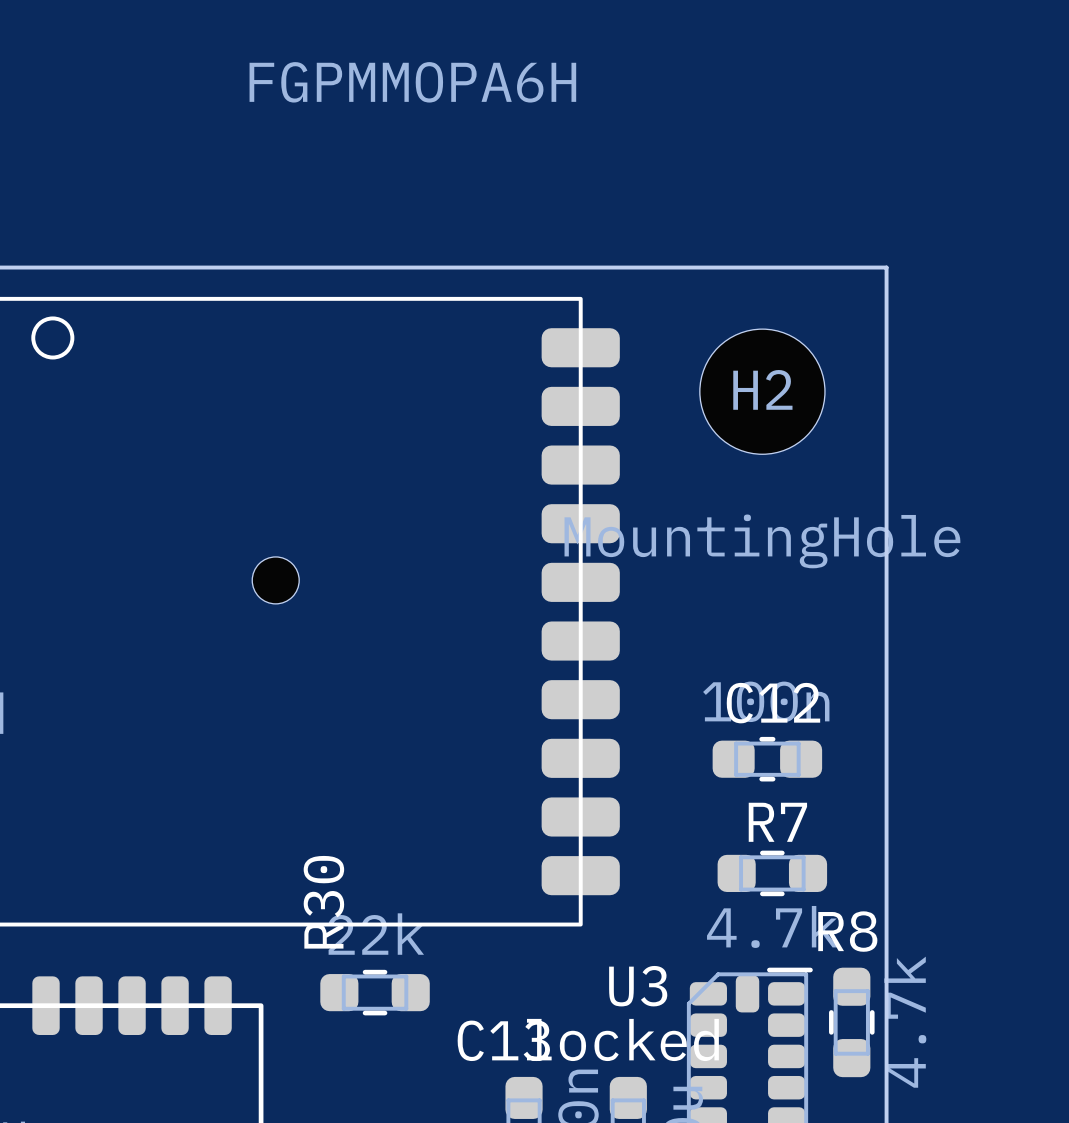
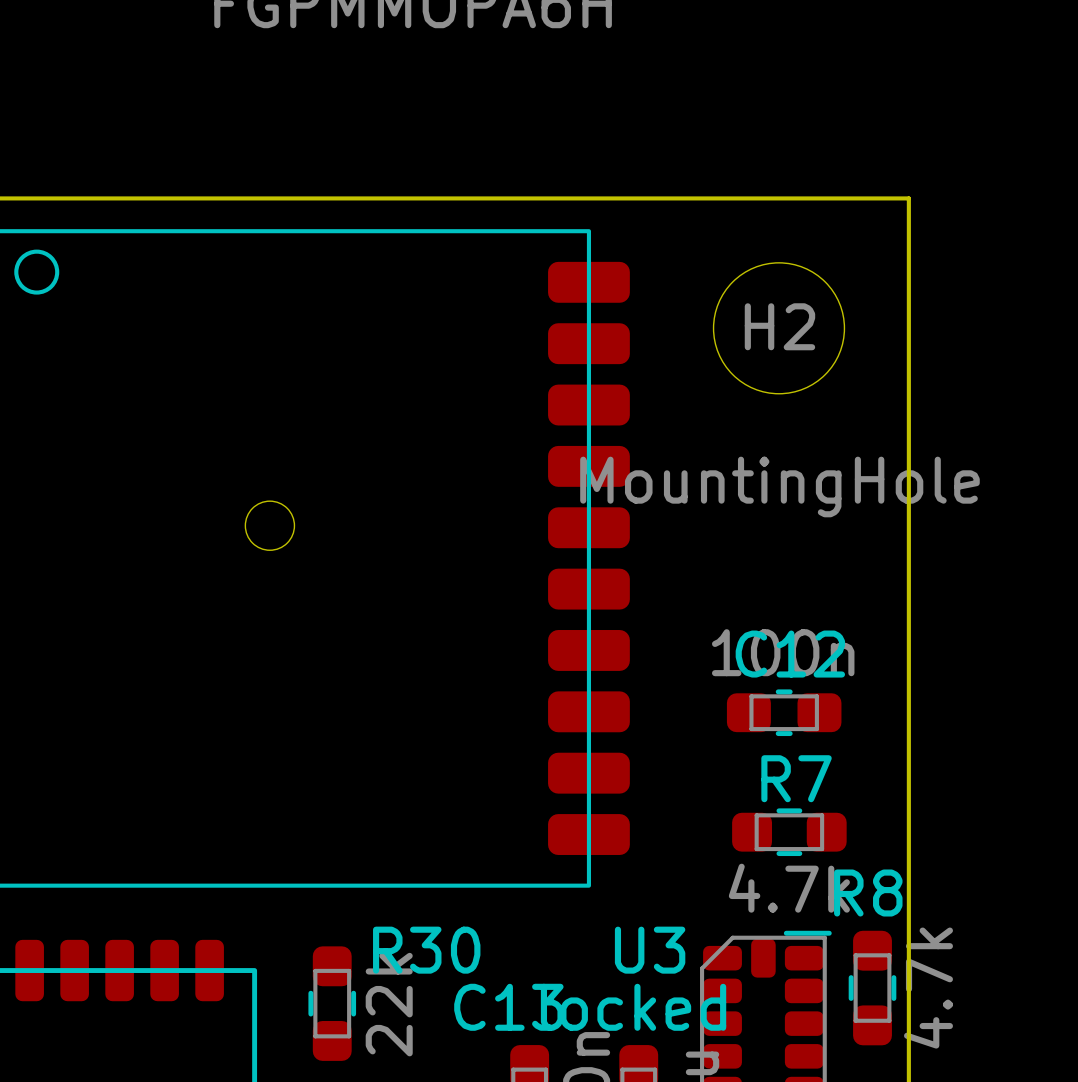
R30 rotation: 0° (375, 992) -> 90° clockwise (332, 1003)

